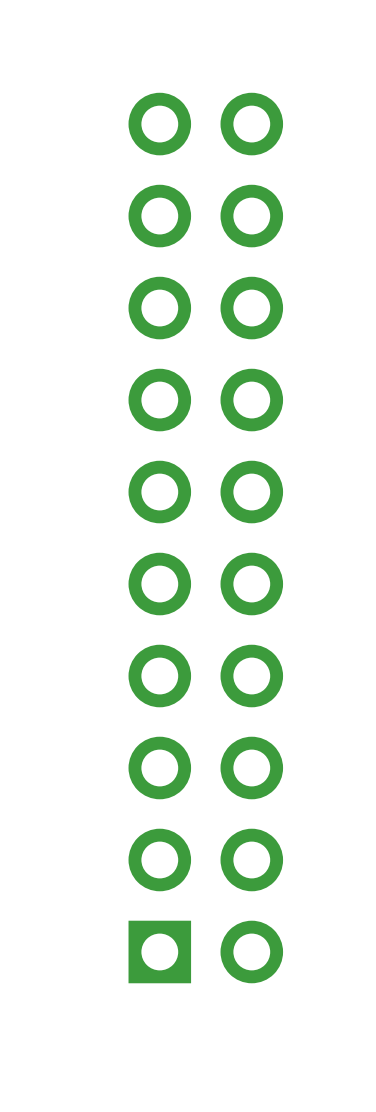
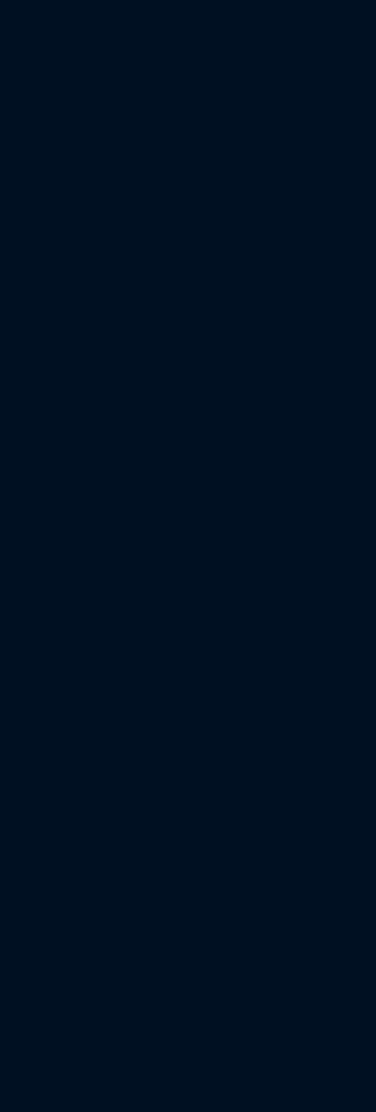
part: (205, 538) -> none

